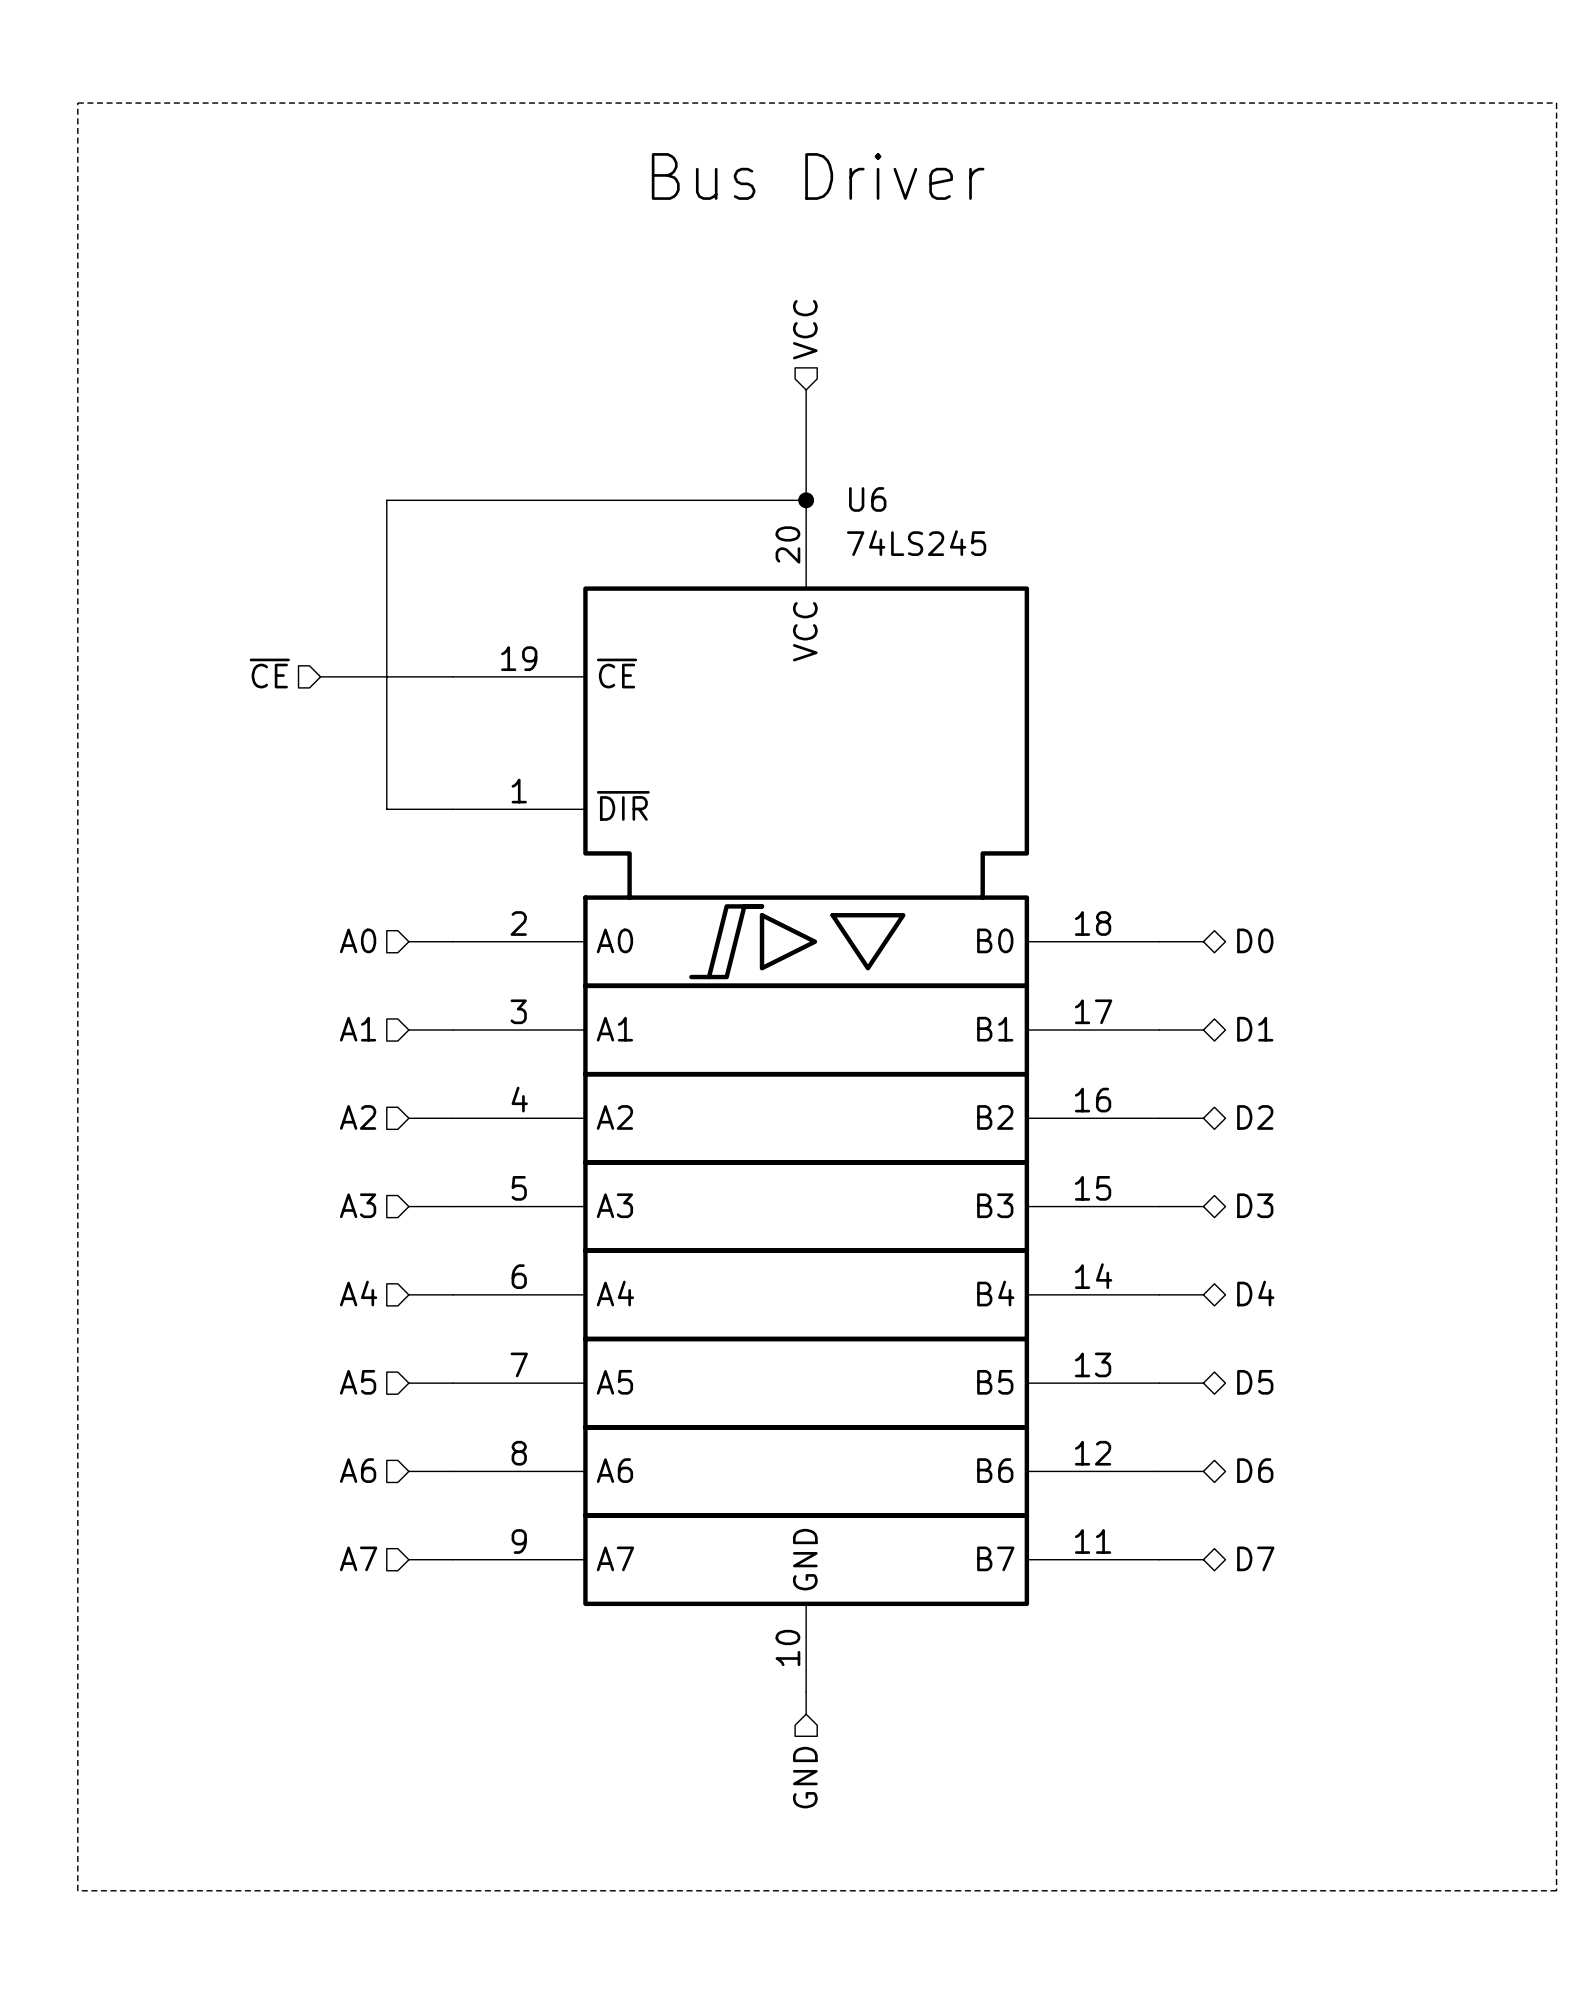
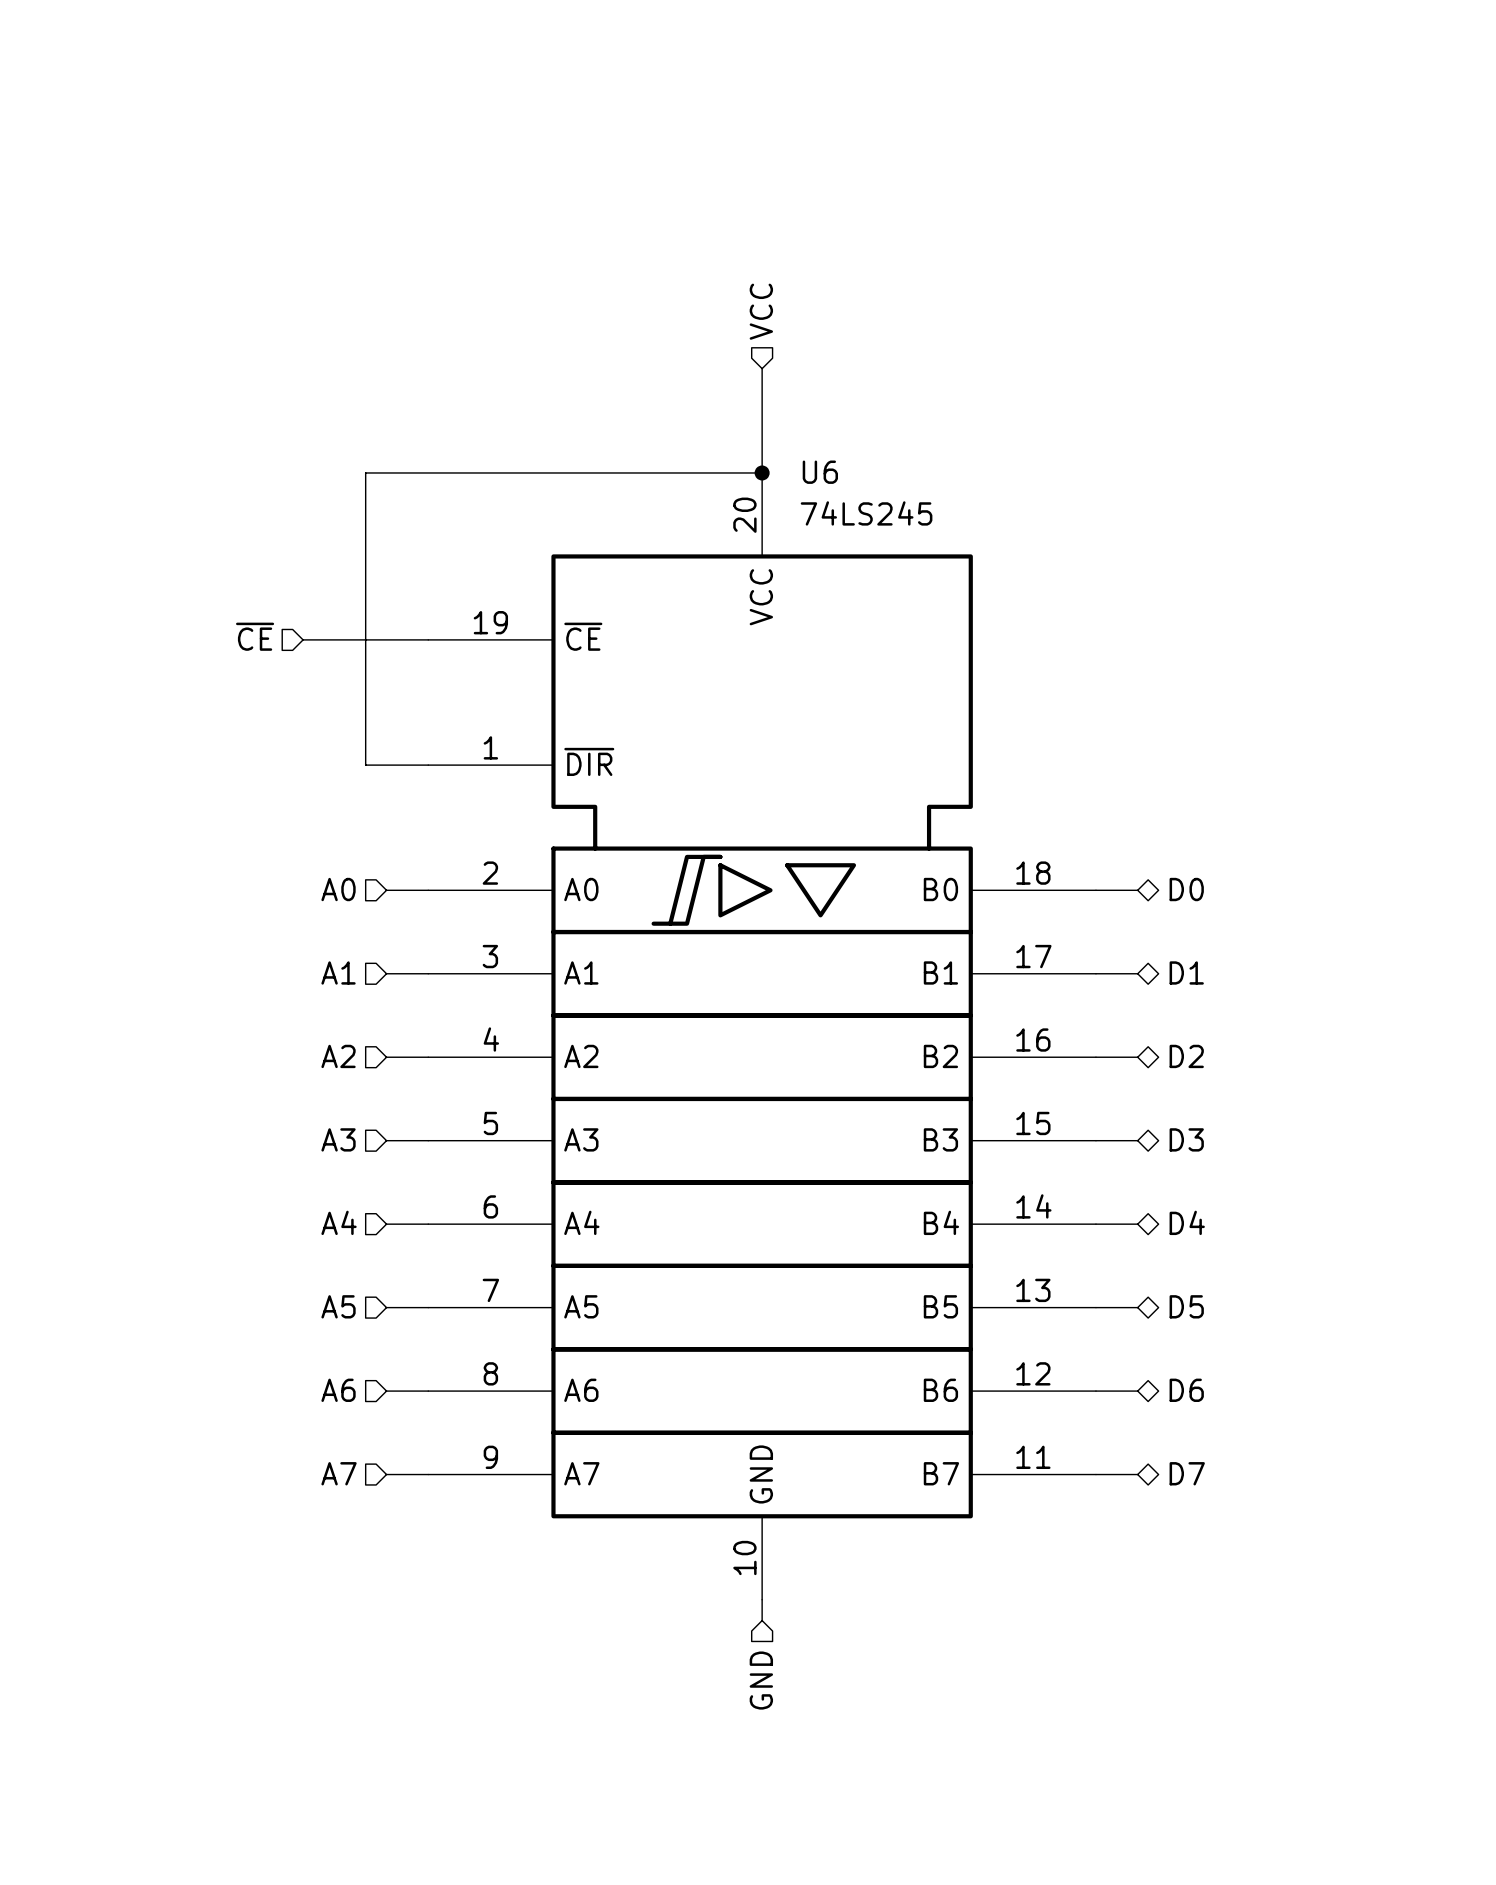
line: (77, 103) (1556, 103) (1556, 1890) (77, 1890) (77, 103) -> none
text: Bus Driver (818, 176) -> none

